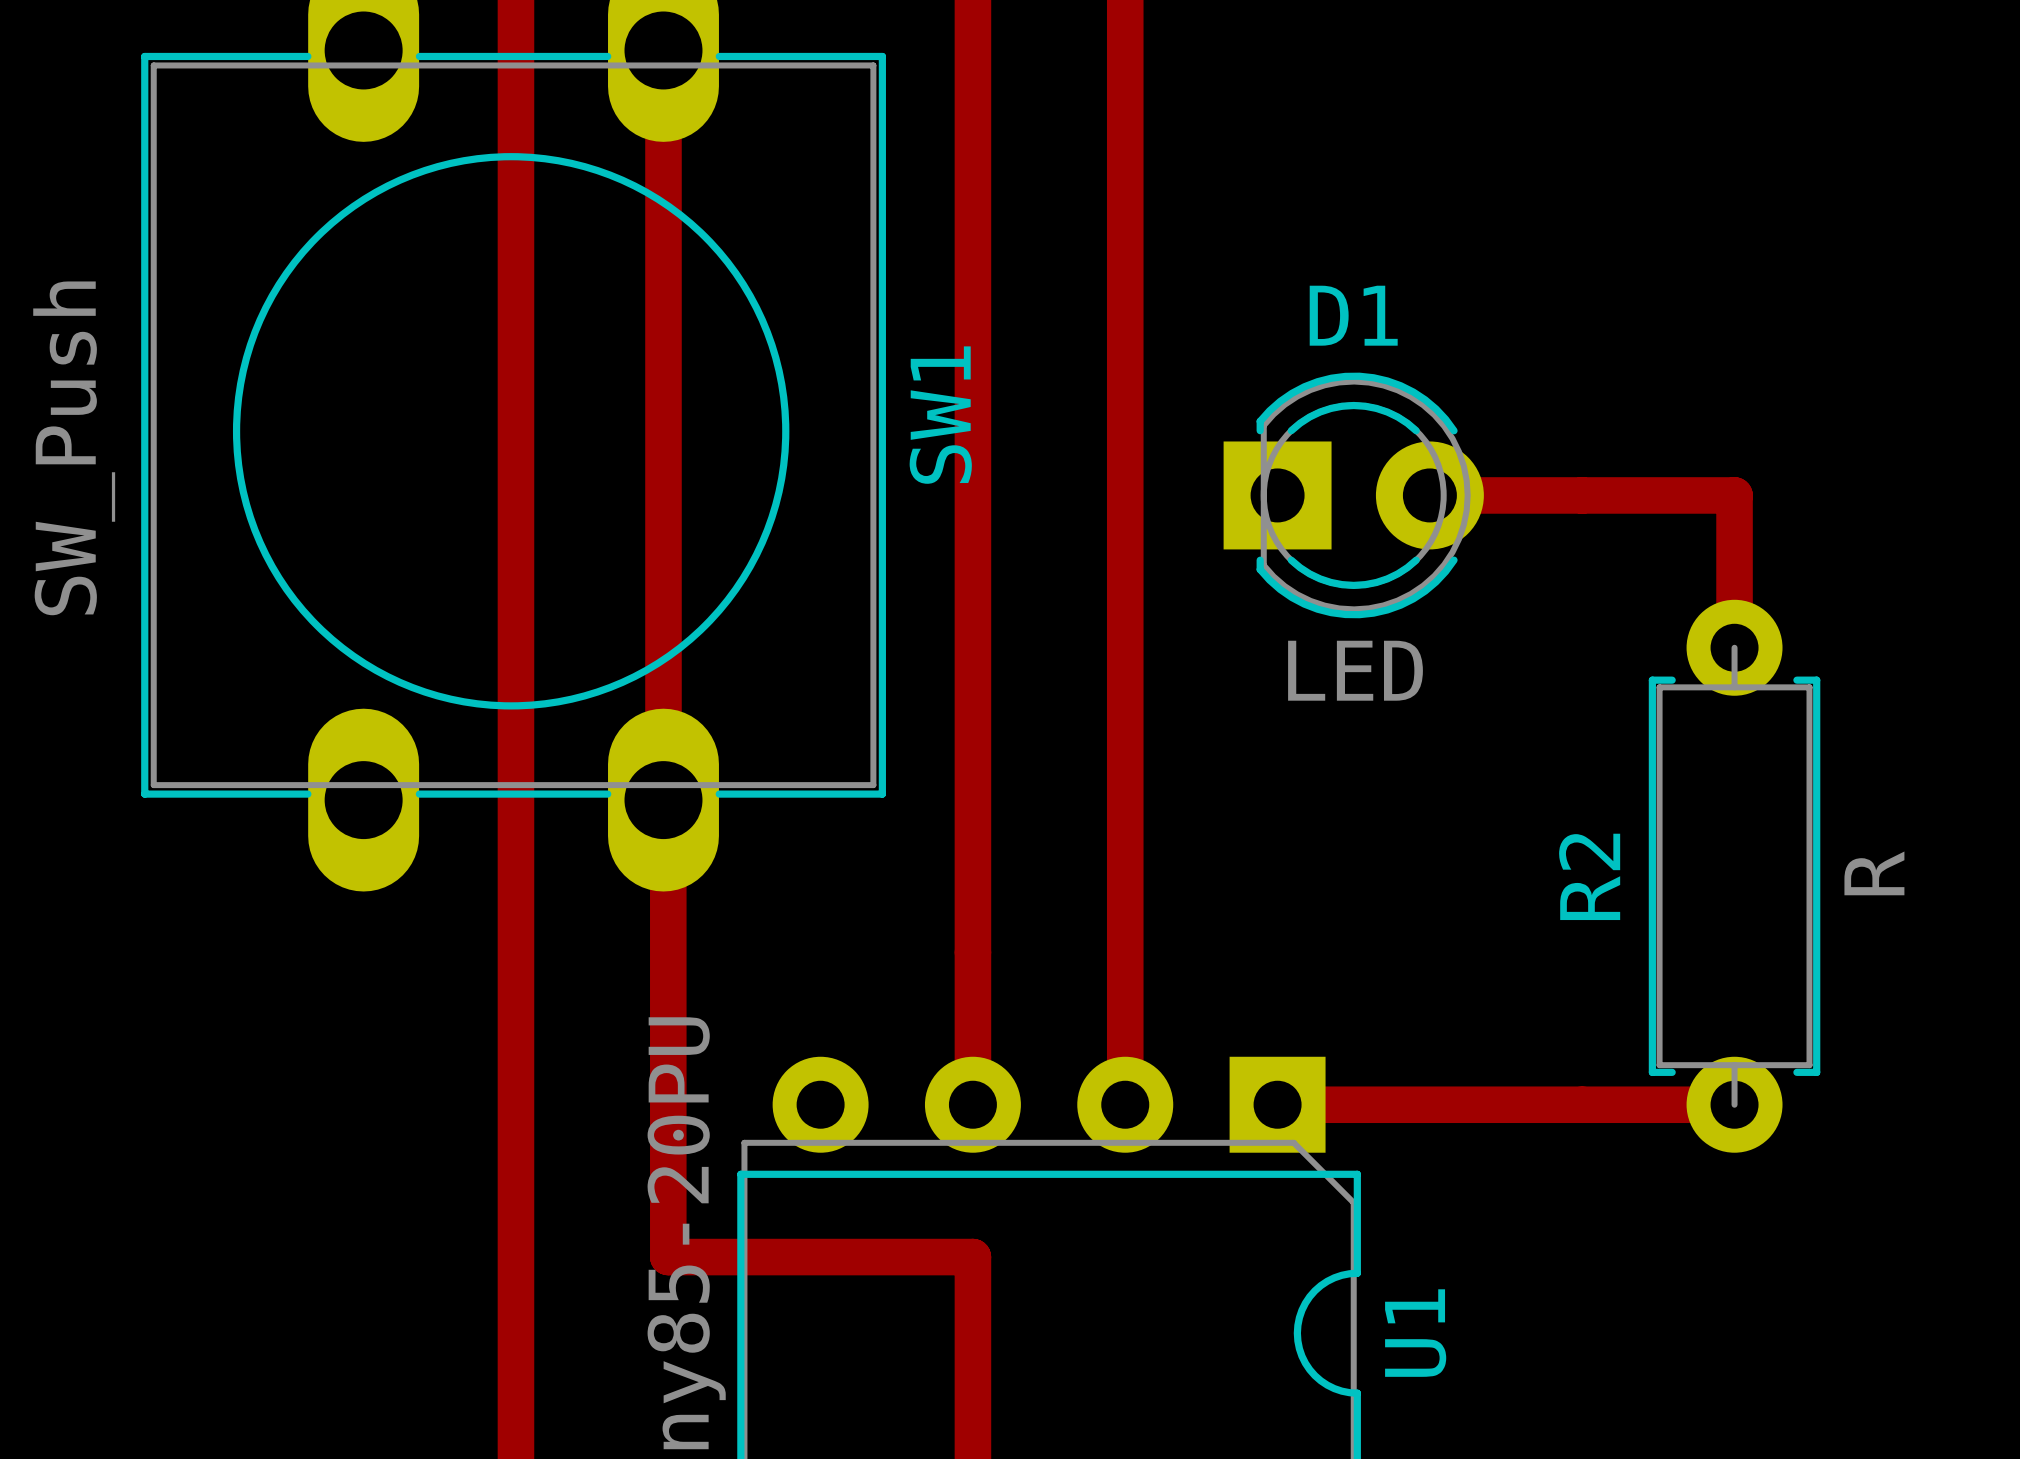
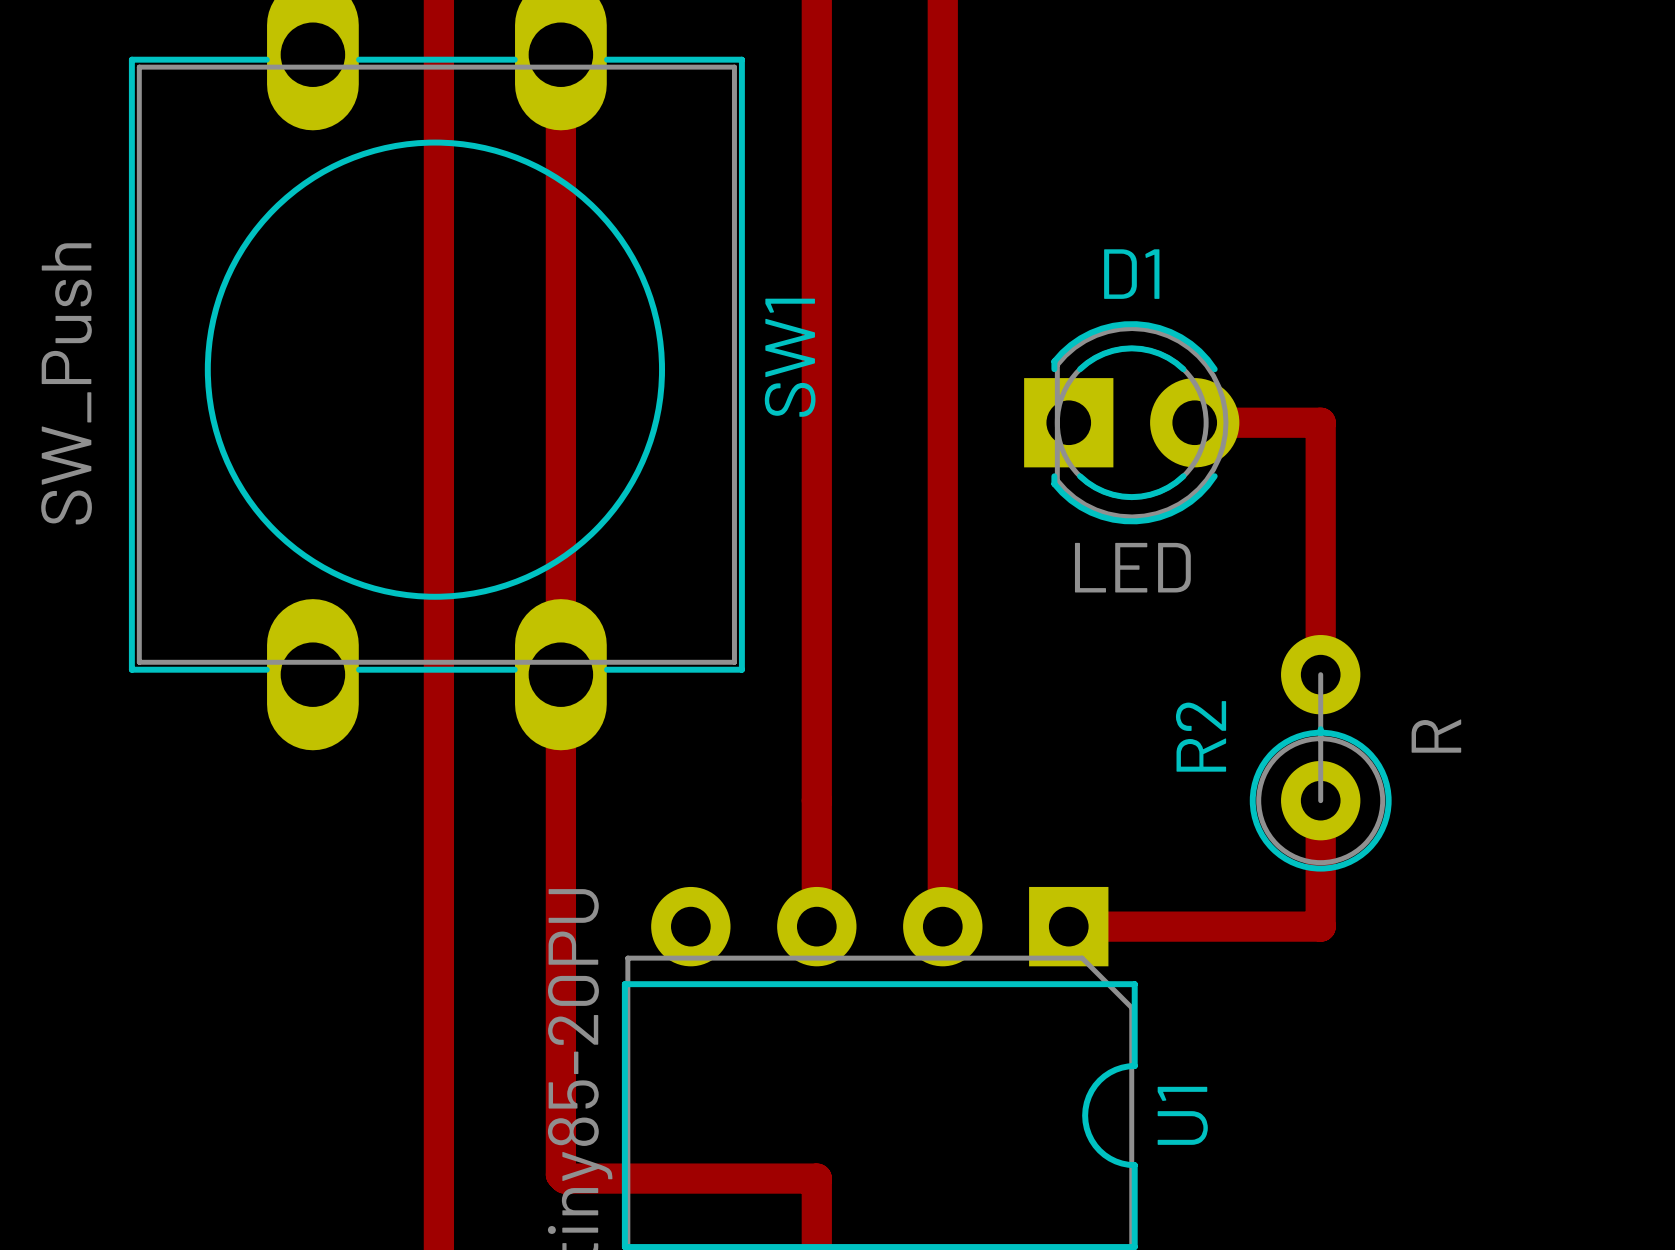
track: (1582, 495) (1734, 495) (1734, 647) -> (1320, 422) (1320, 674)
R2 footprint: [1648, 599, 1821, 1153] -> [1249, 635, 1392, 872]
track: (668, 800) (668, 1257) (972, 1257) (972, 1409) -> (560, 674) (560, 1174) (564, 1178) (816, 1178)
track: (1582, 1104) (1734, 1104) -> (1320, 926) (1320, 800)

